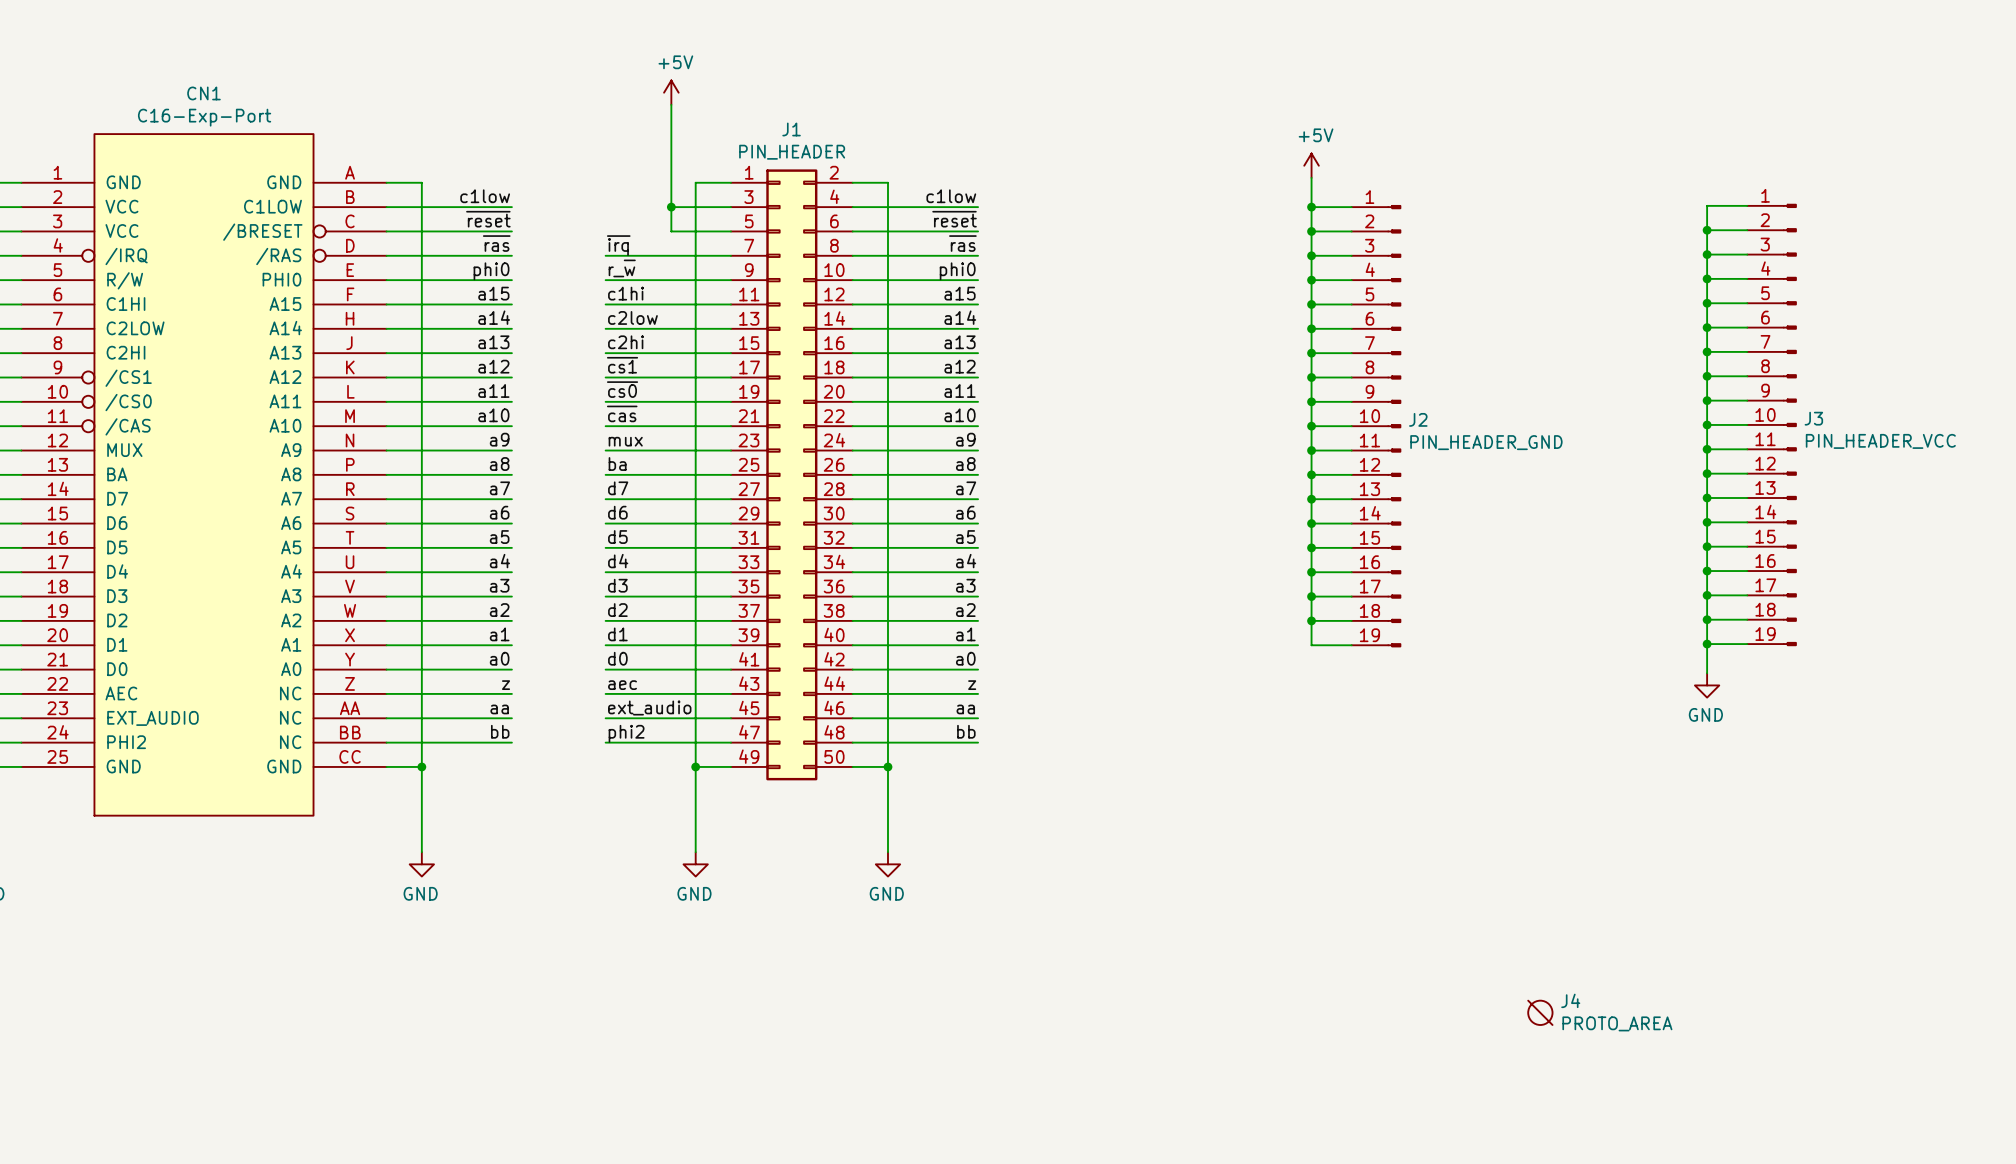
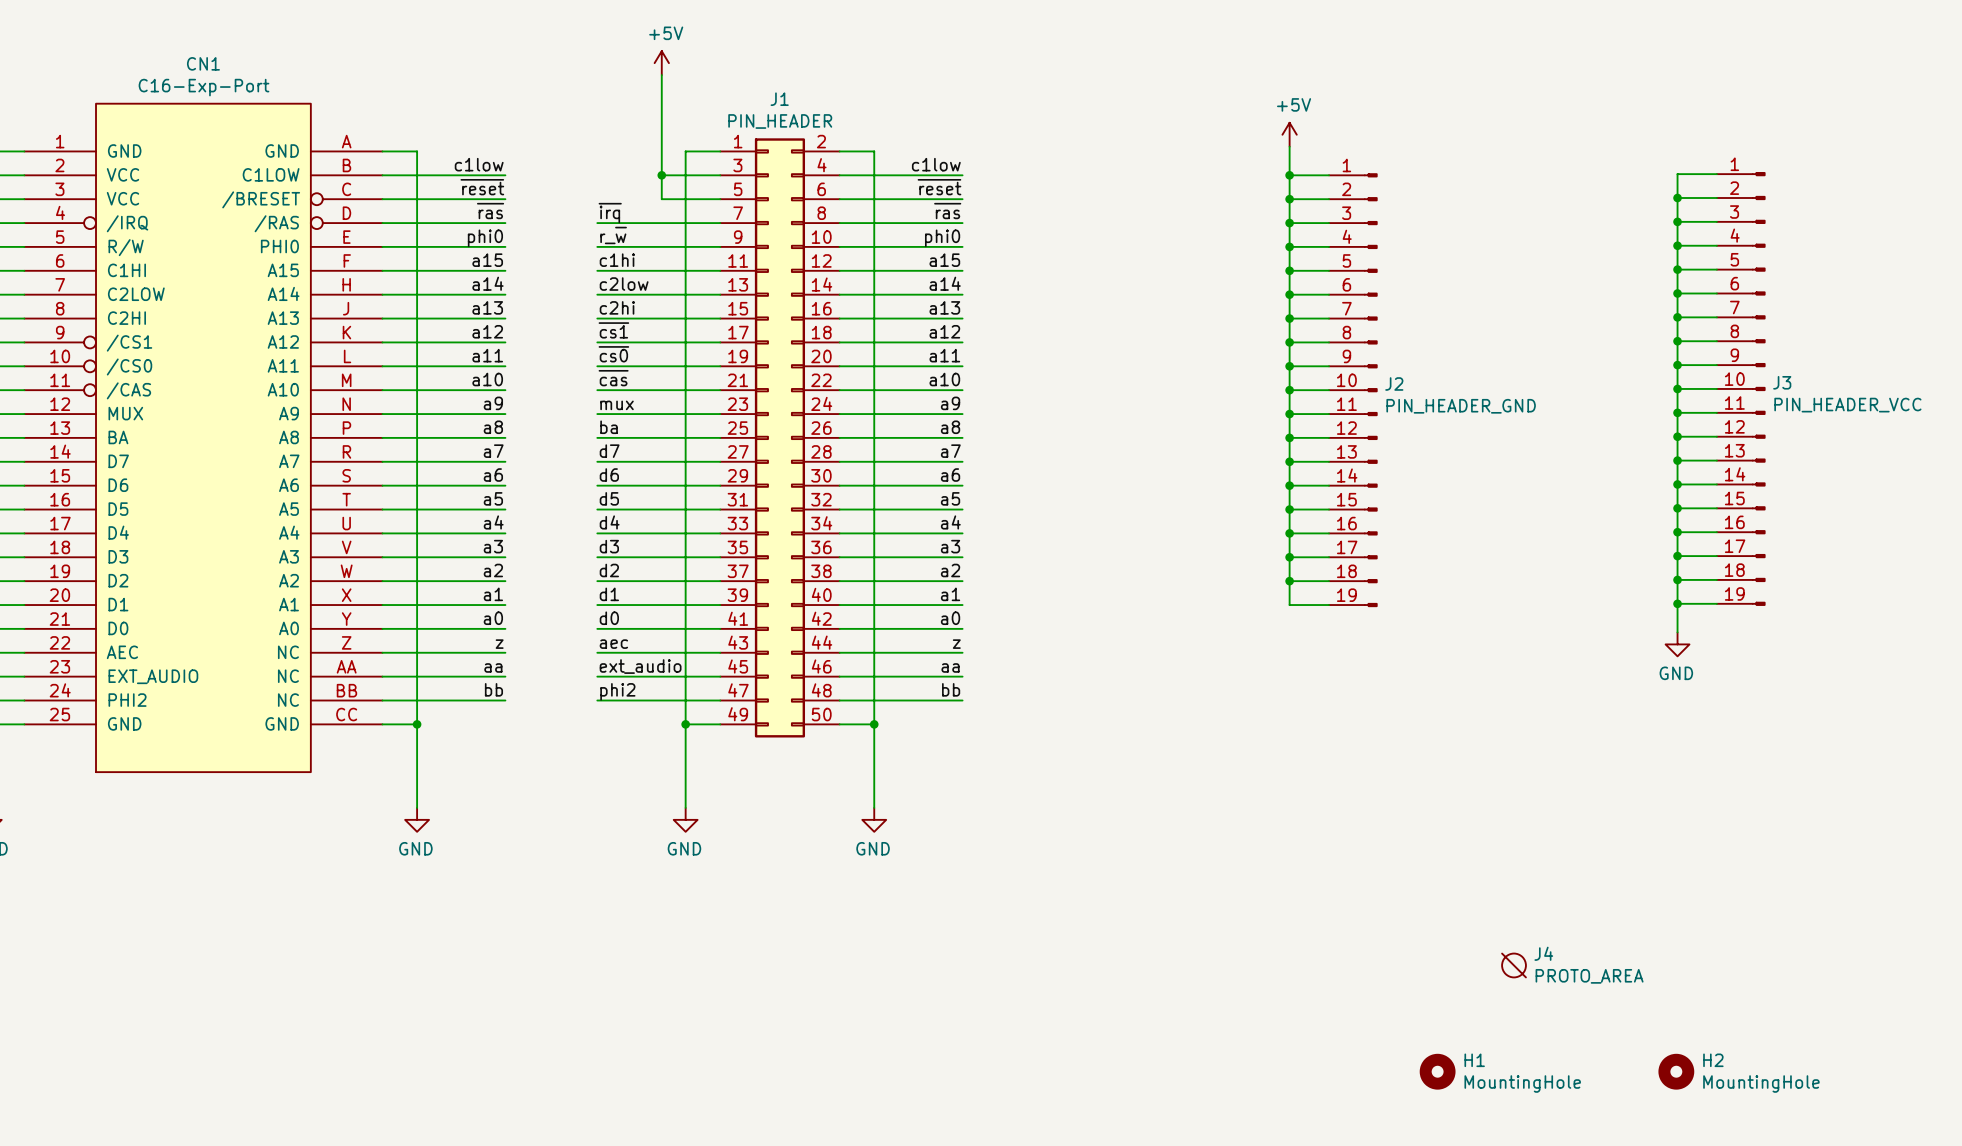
H1: none -> MountingHole (1437, 1071)
H2: none -> MountingHole (1676, 1071)

